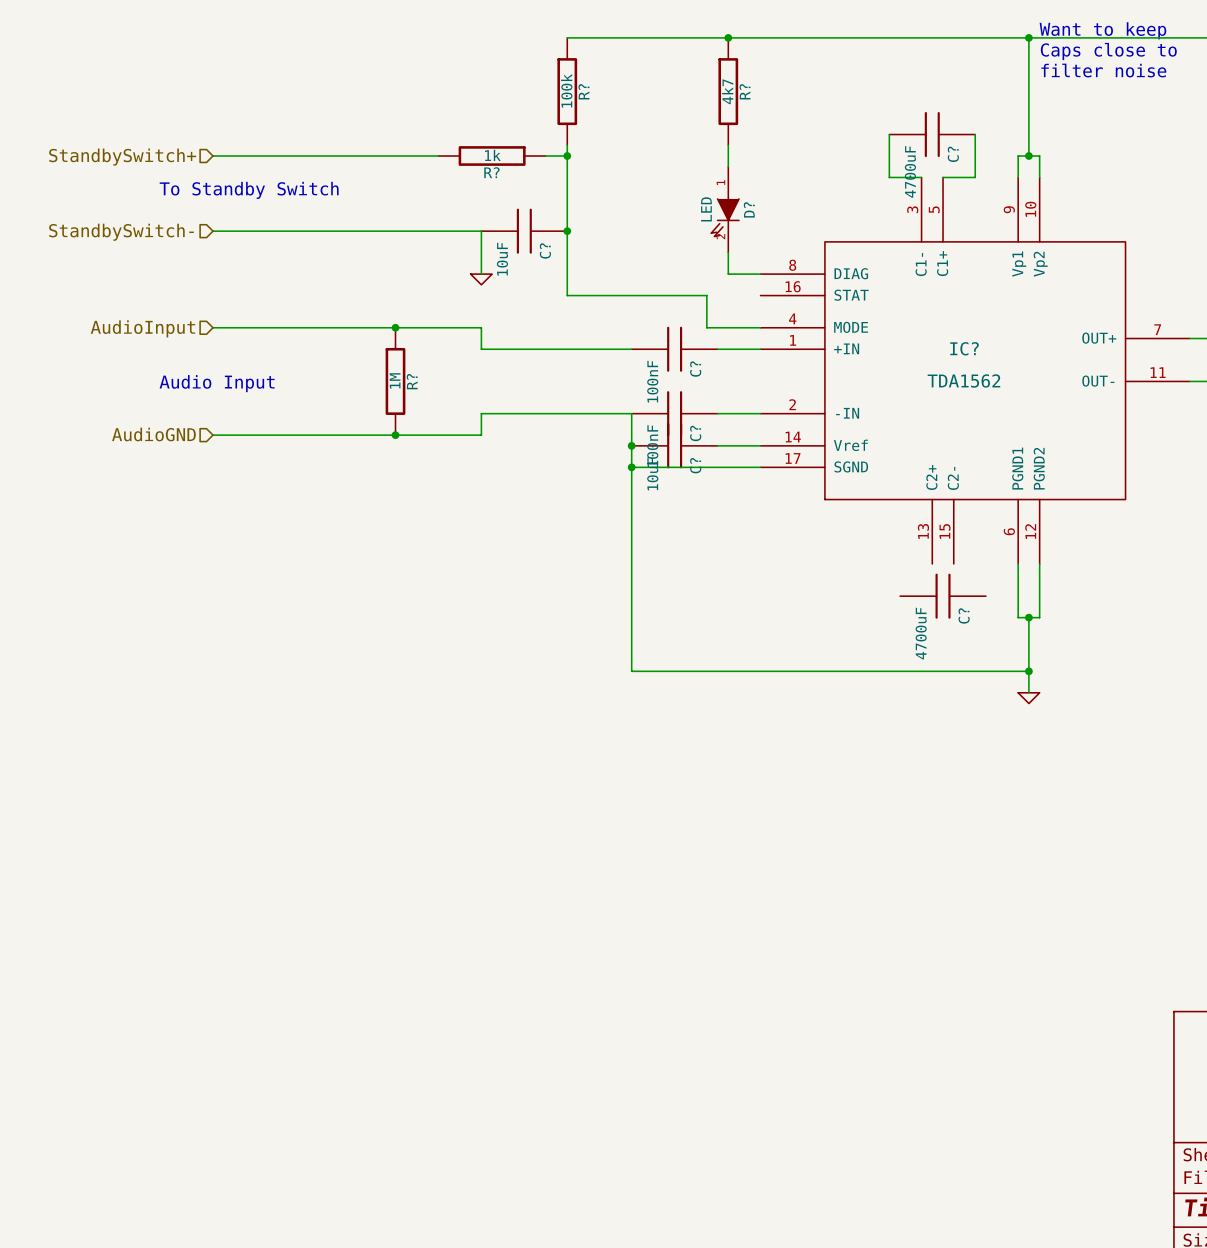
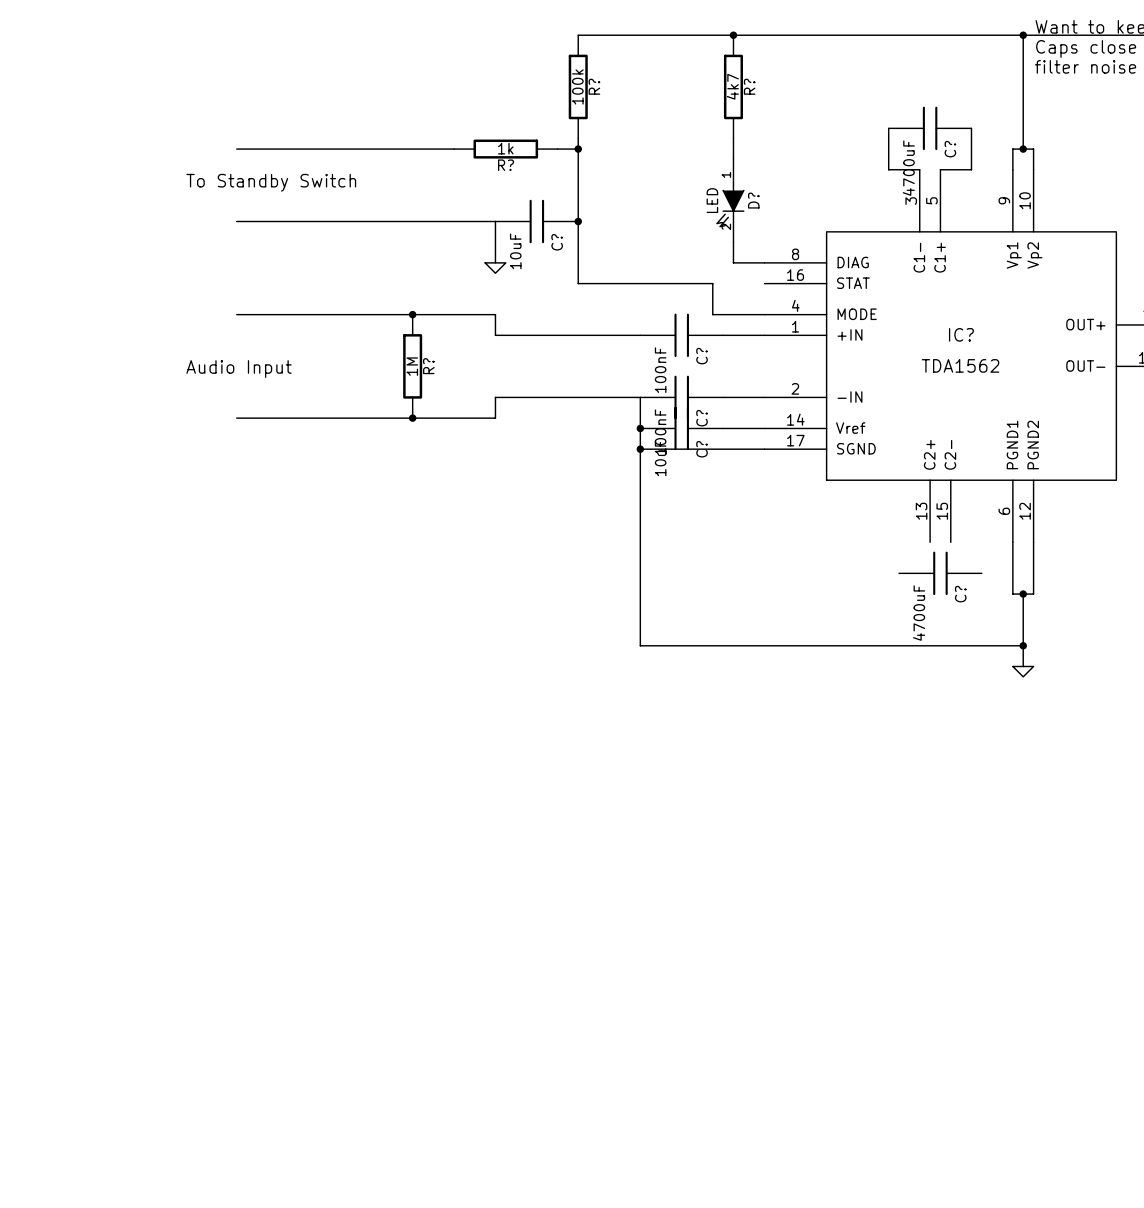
hierarchical label: StandbySwitch+ (122, 157) -> none
hierarchical label: StandbySwitch- (121, 232) -> none
hierarchical label: AudioInput (142, 328) -> none
hierarchical label: AudioGND (153, 434) -> none

